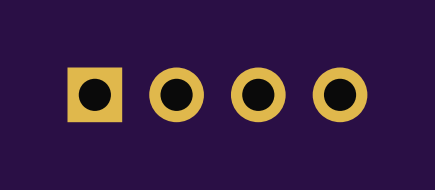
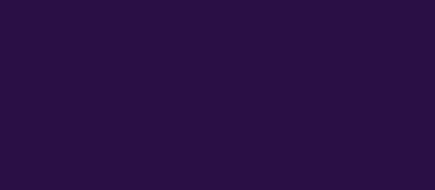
part: (217, 94) -> none

